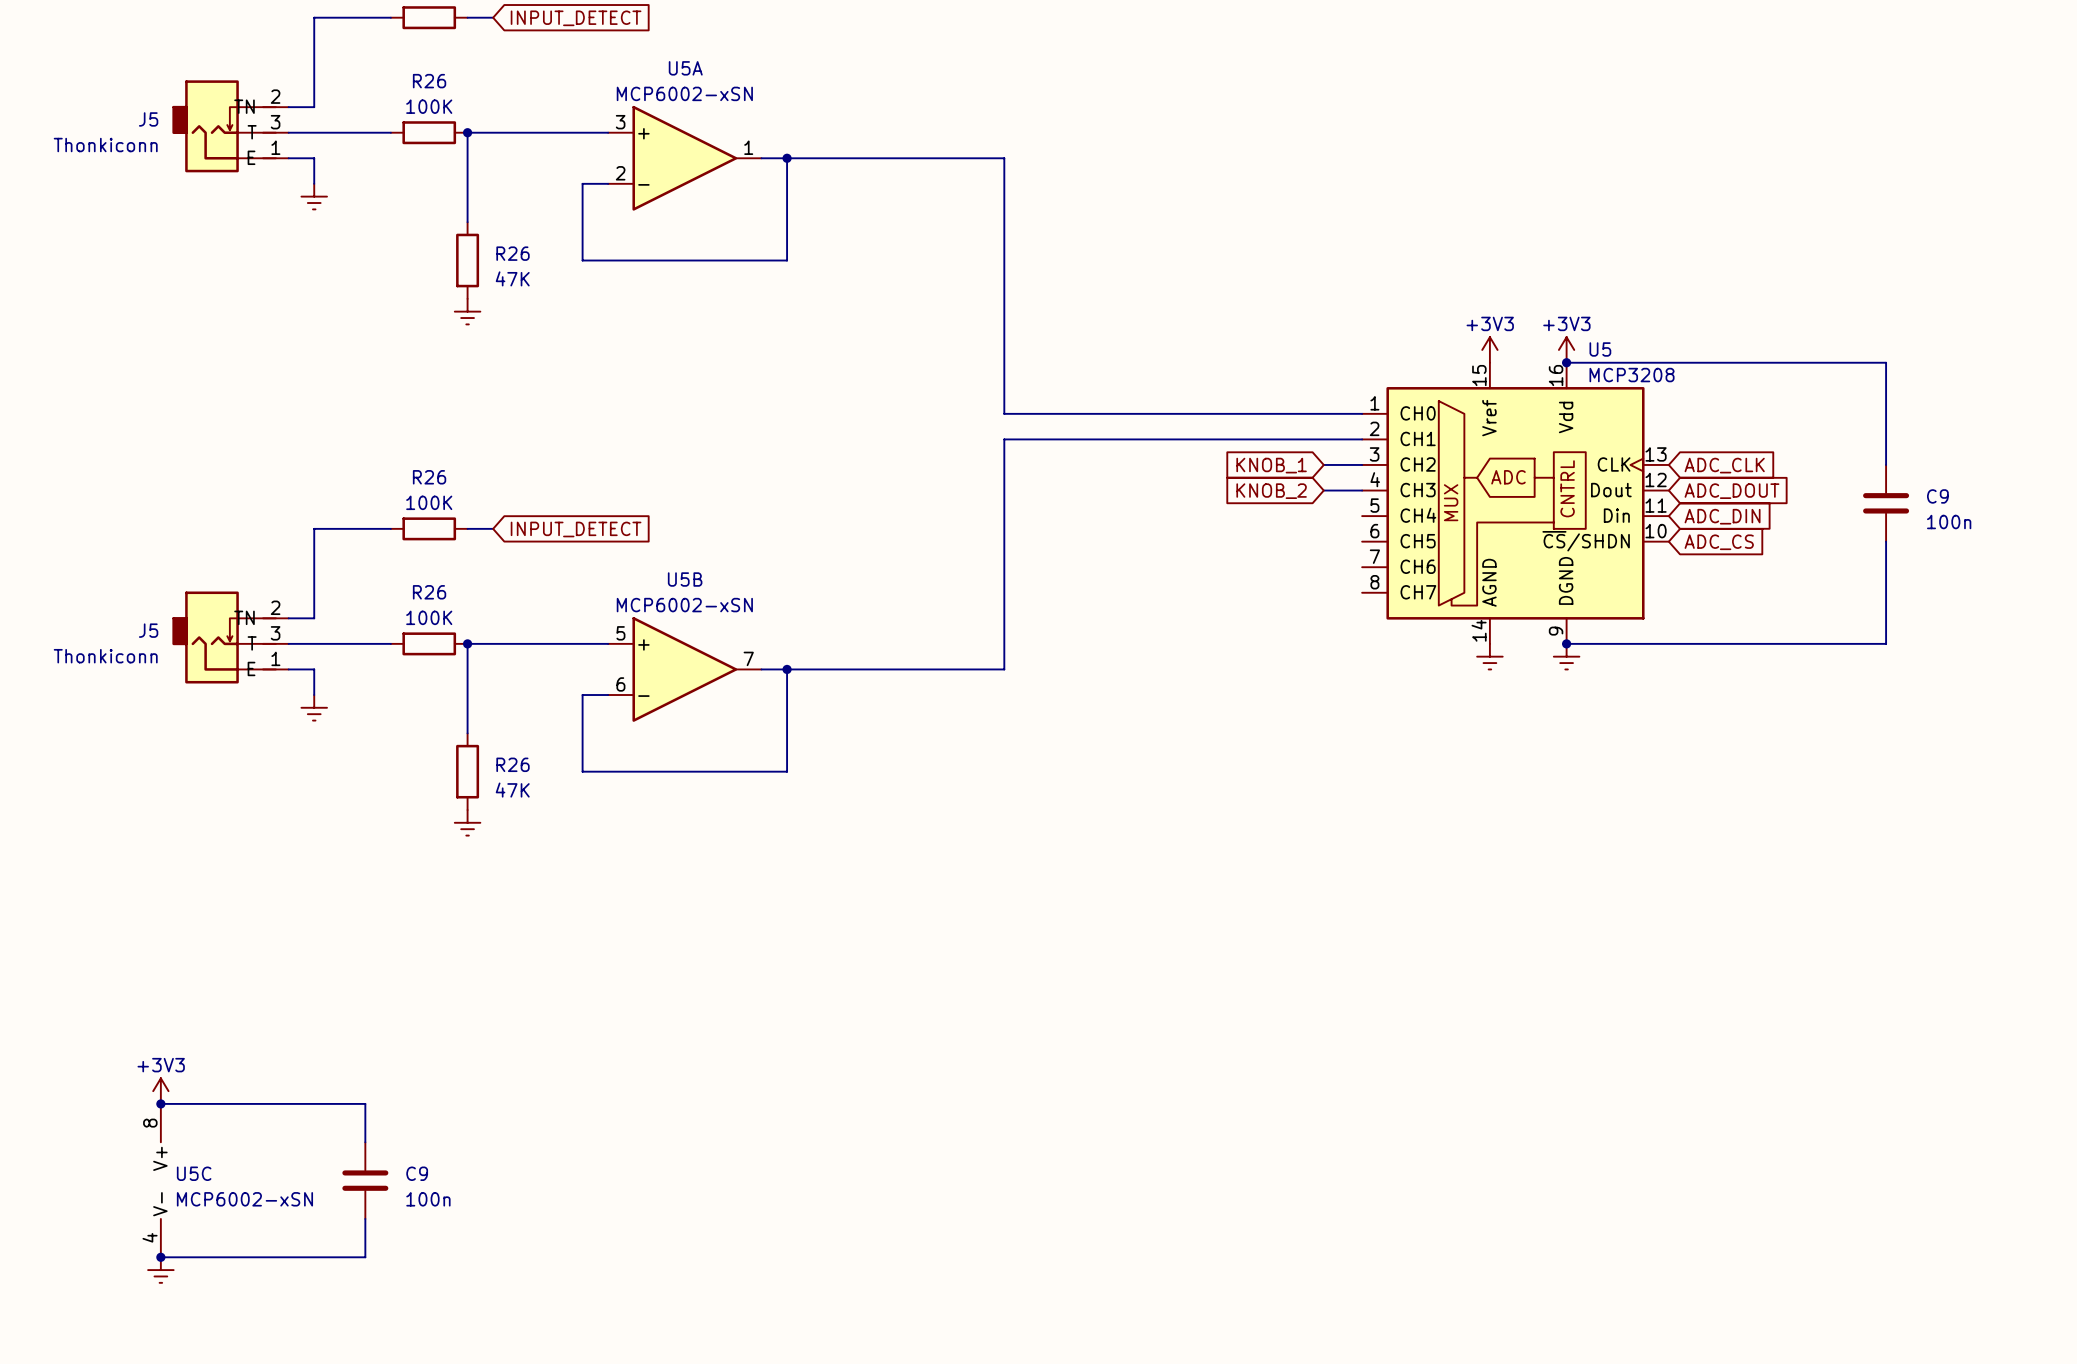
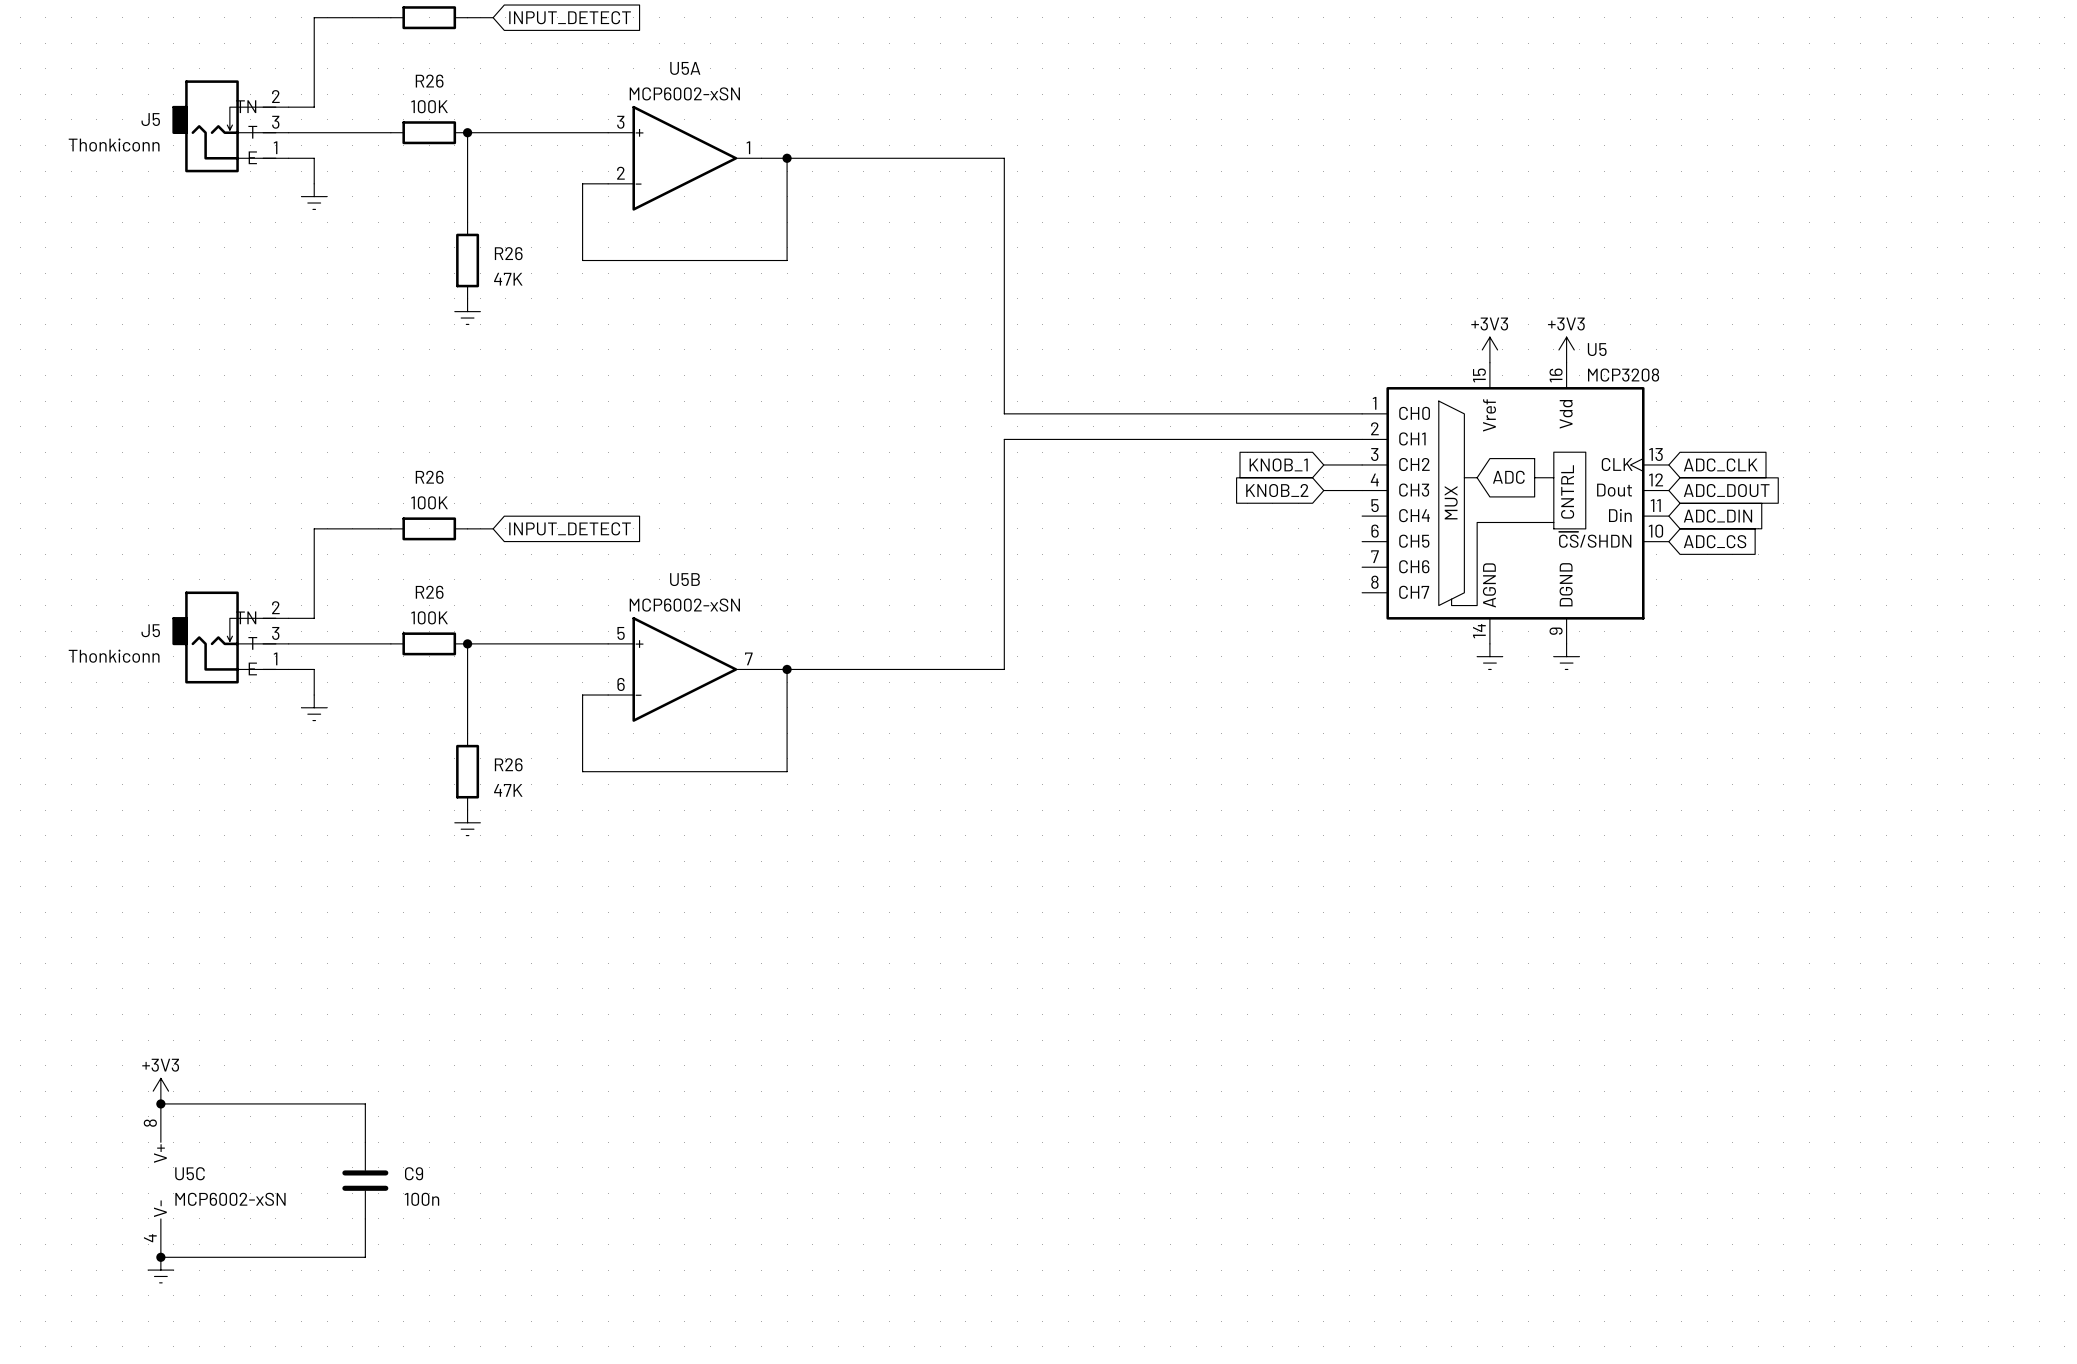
wire: (1566, 362) (1886, 362) (1886, 464) -> none
junction: (1566, 362) -> none
C9: 100n (1886, 503) -> none
wire: (1886, 541) (1886, 643) (1566, 643) -> none
junction: (1566, 643) -> none

